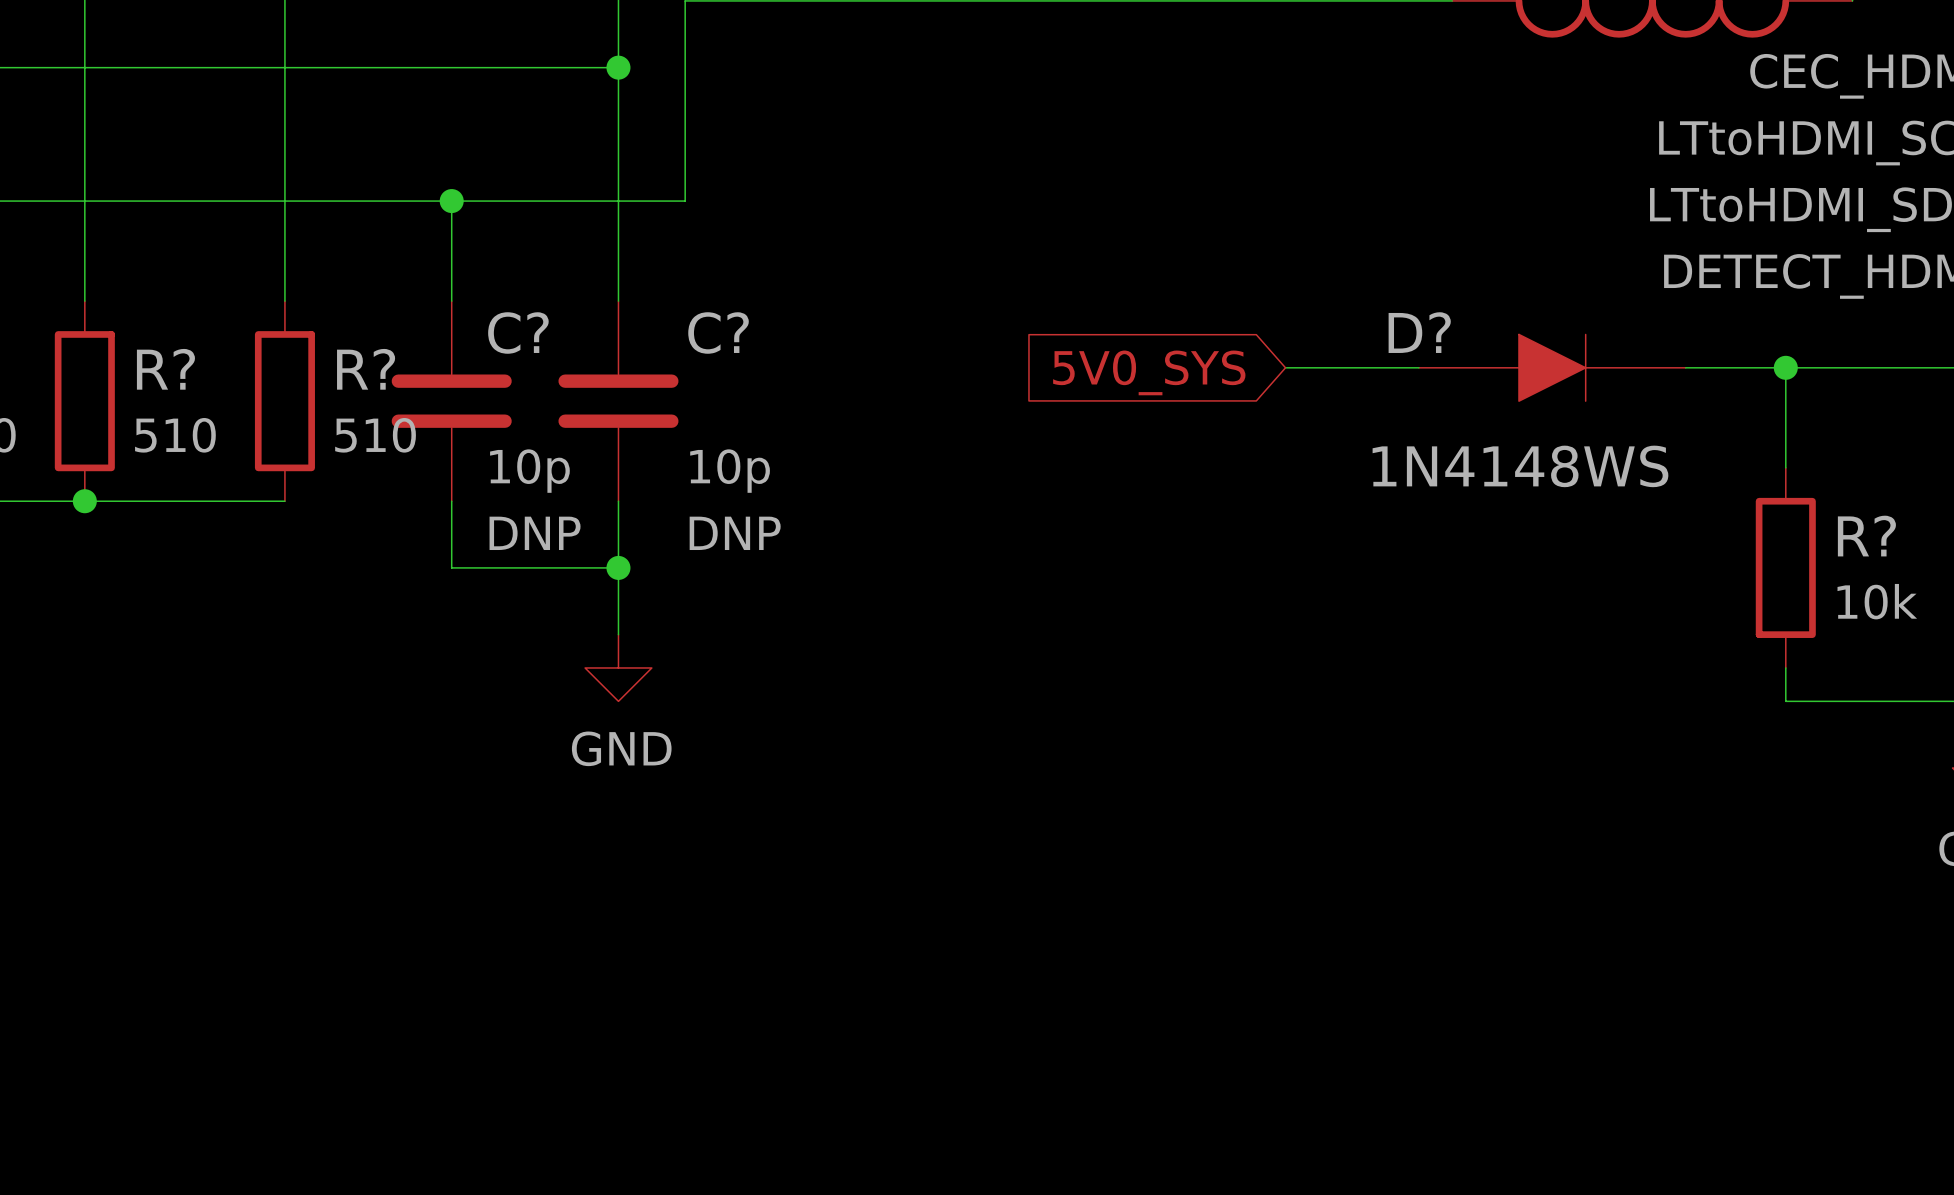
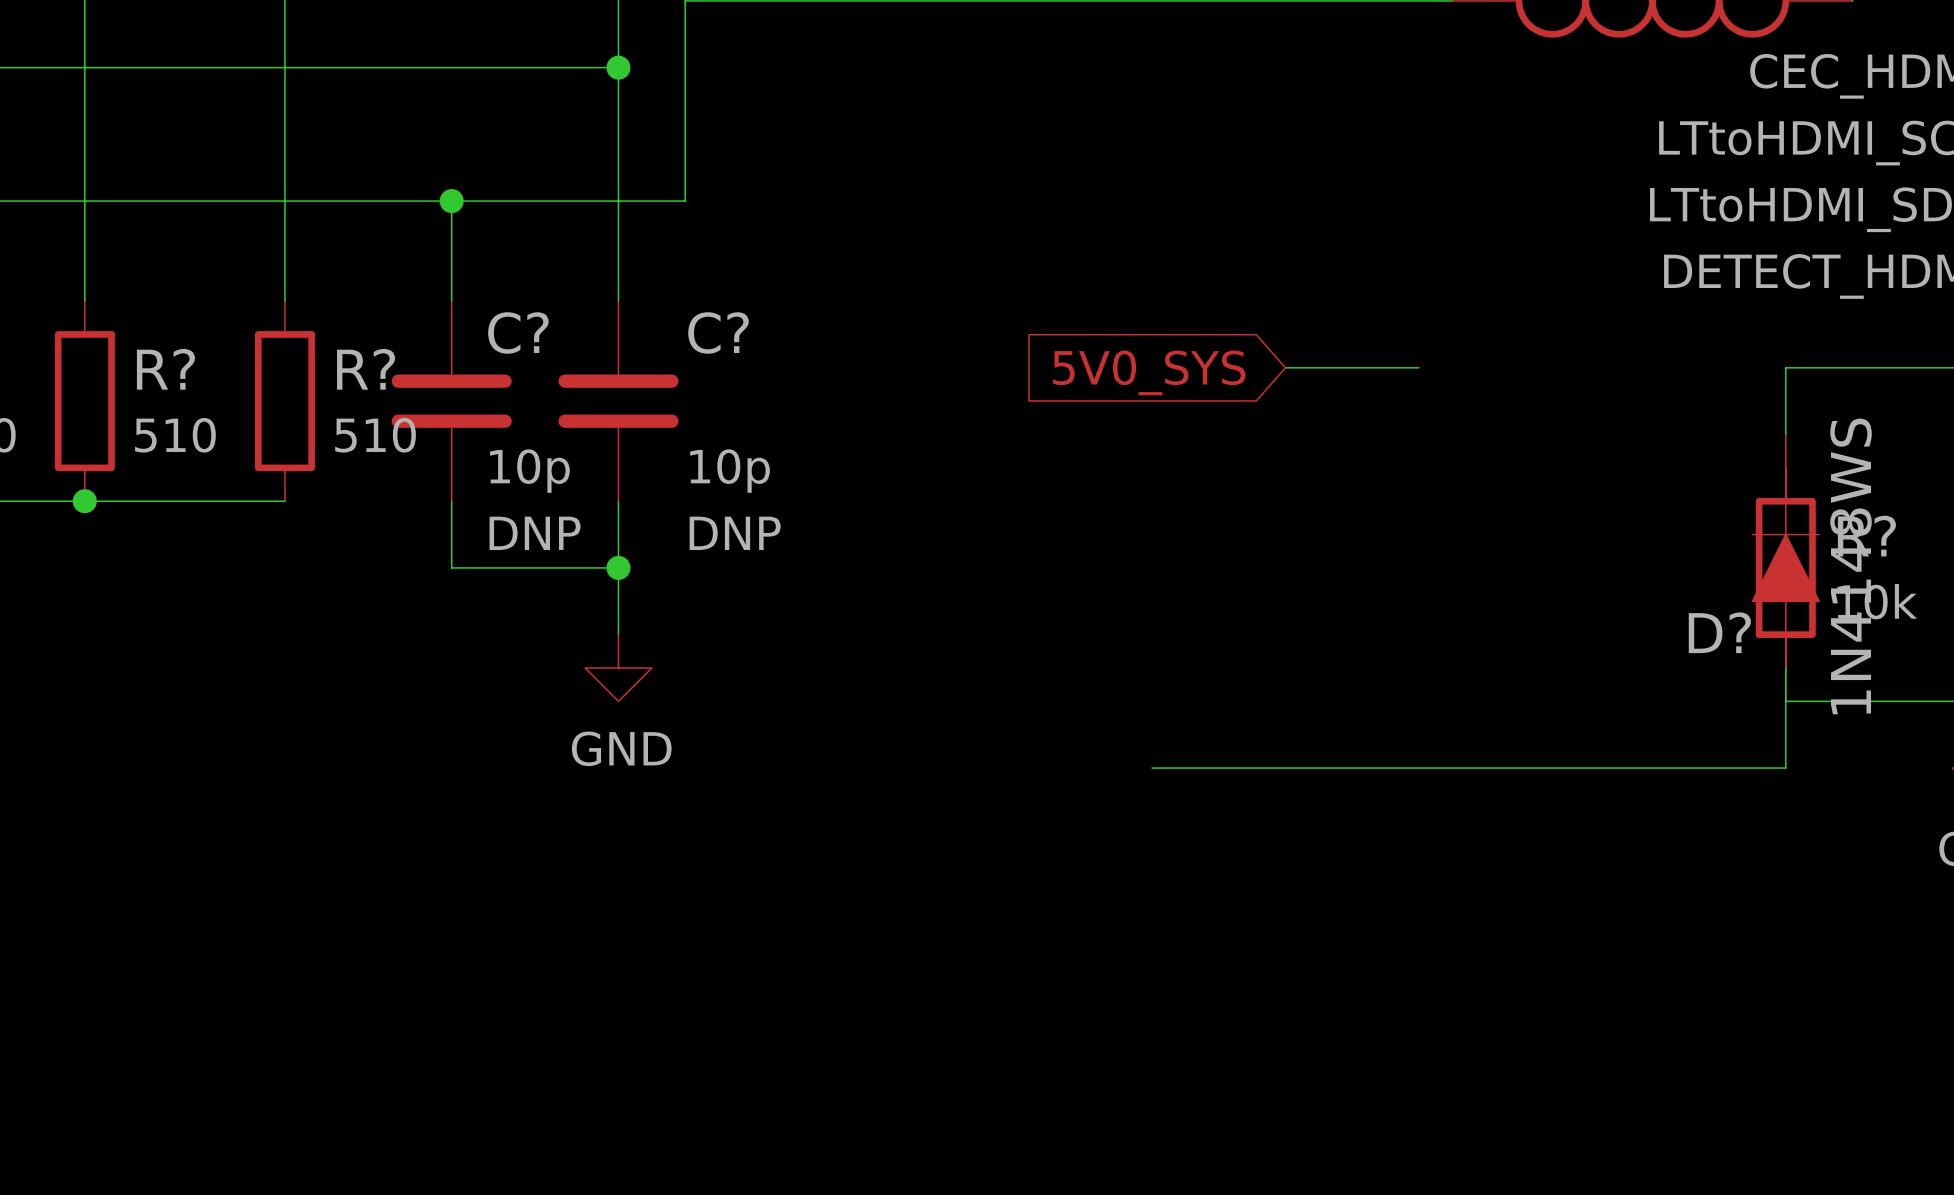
D? name position: D? (1419, 332) -> D? (1719, 632)
D? rotation: 0° (1552, 367) -> 90° counterclockwise (1785, 567)
D? position: (1552, 367) -> (1785, 567)
wire: (1685, 367) (1785, 367) -> none
junction: (1785, 367) -> none
wire: none -> (1785, 701) (1785, 768) (1152, 768)

